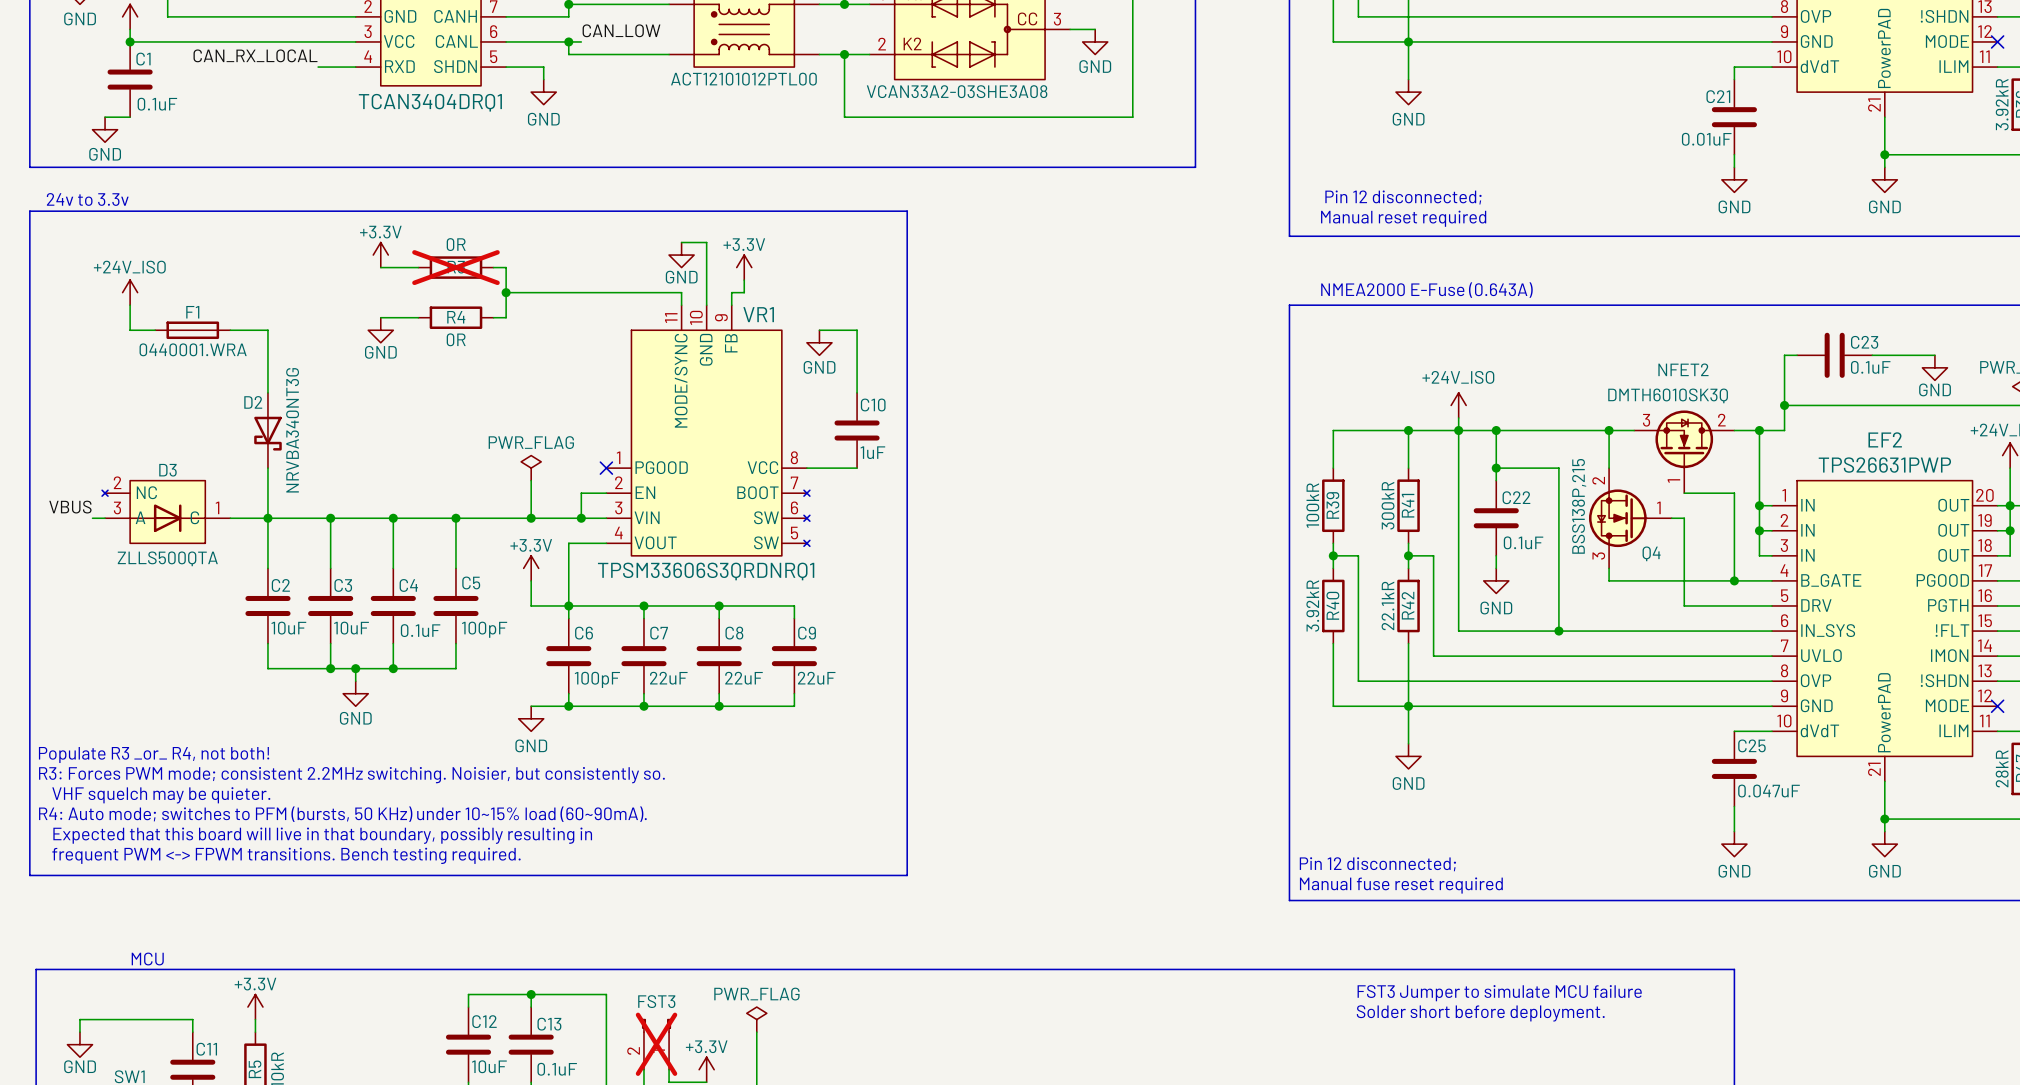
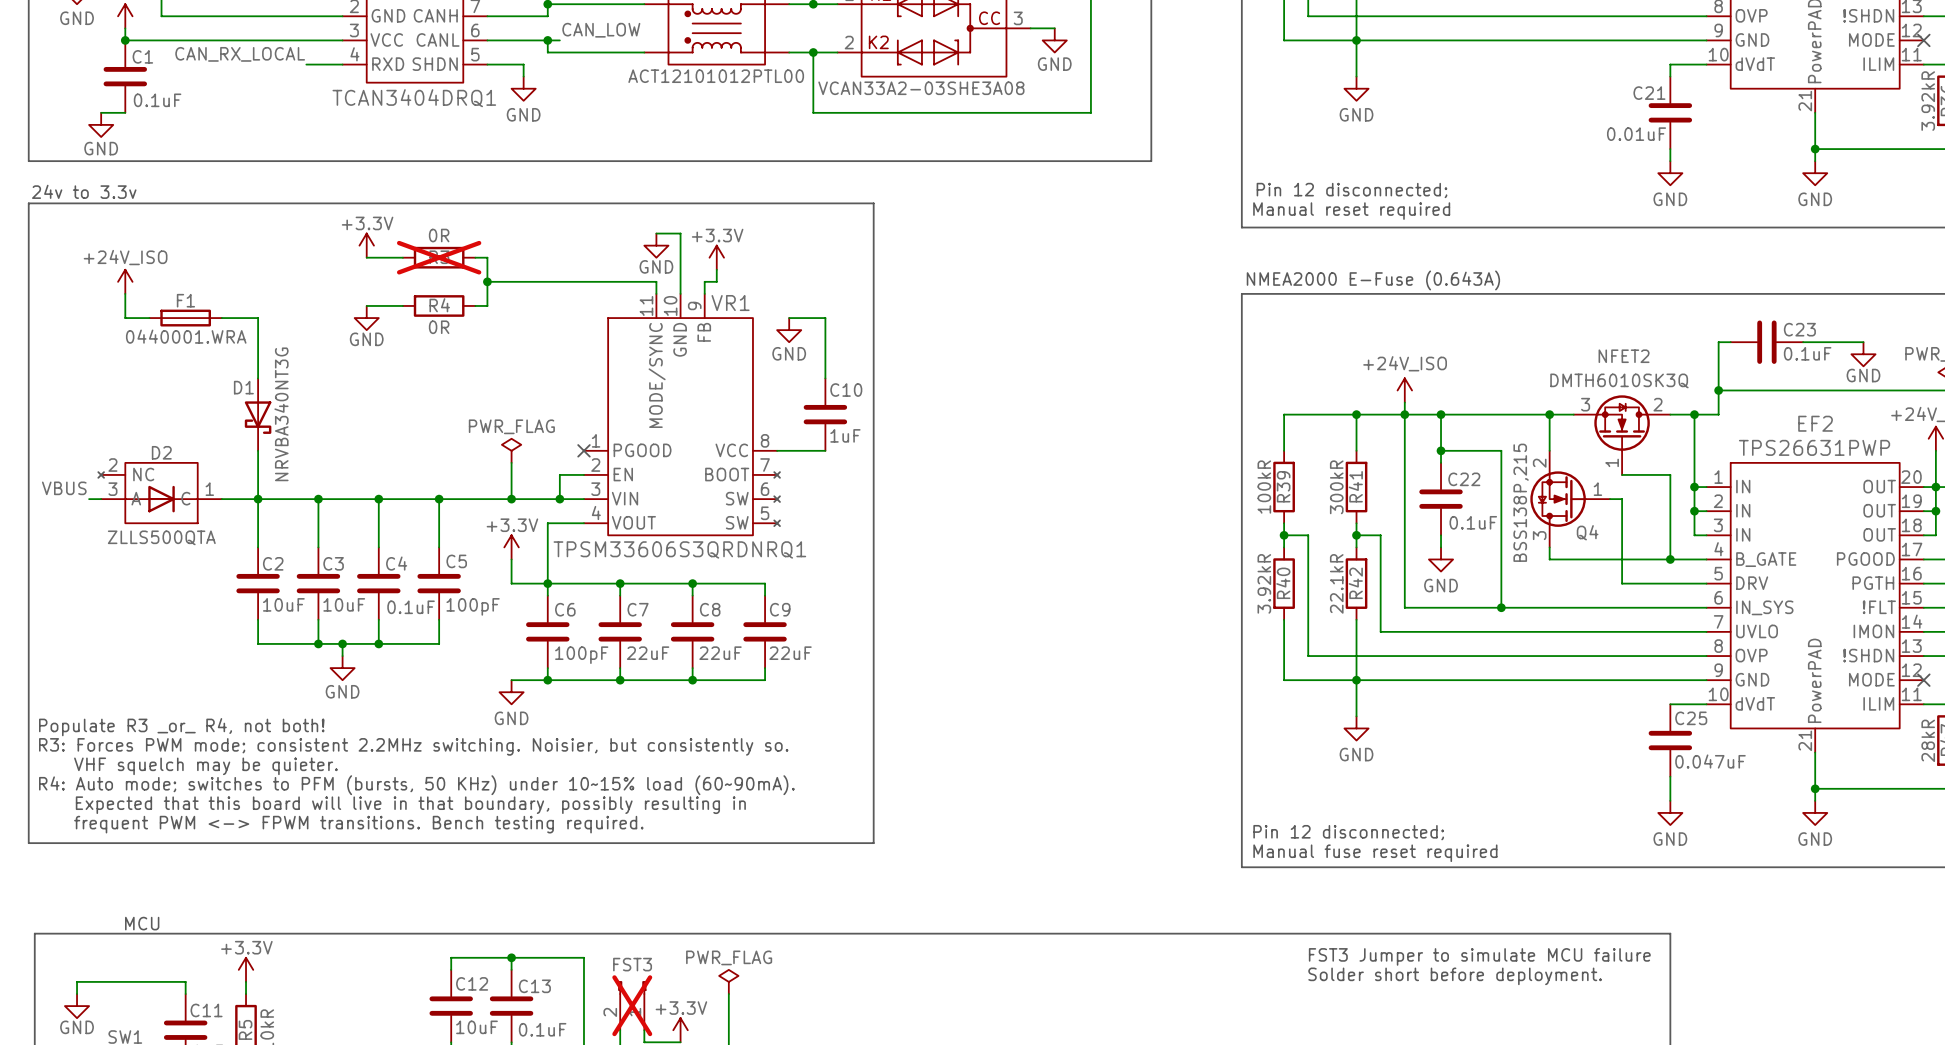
D2 name: D2 (253, 402) -> D1 (243, 387)
D3 name: D3 (167, 470) -> D2 (161, 452)

